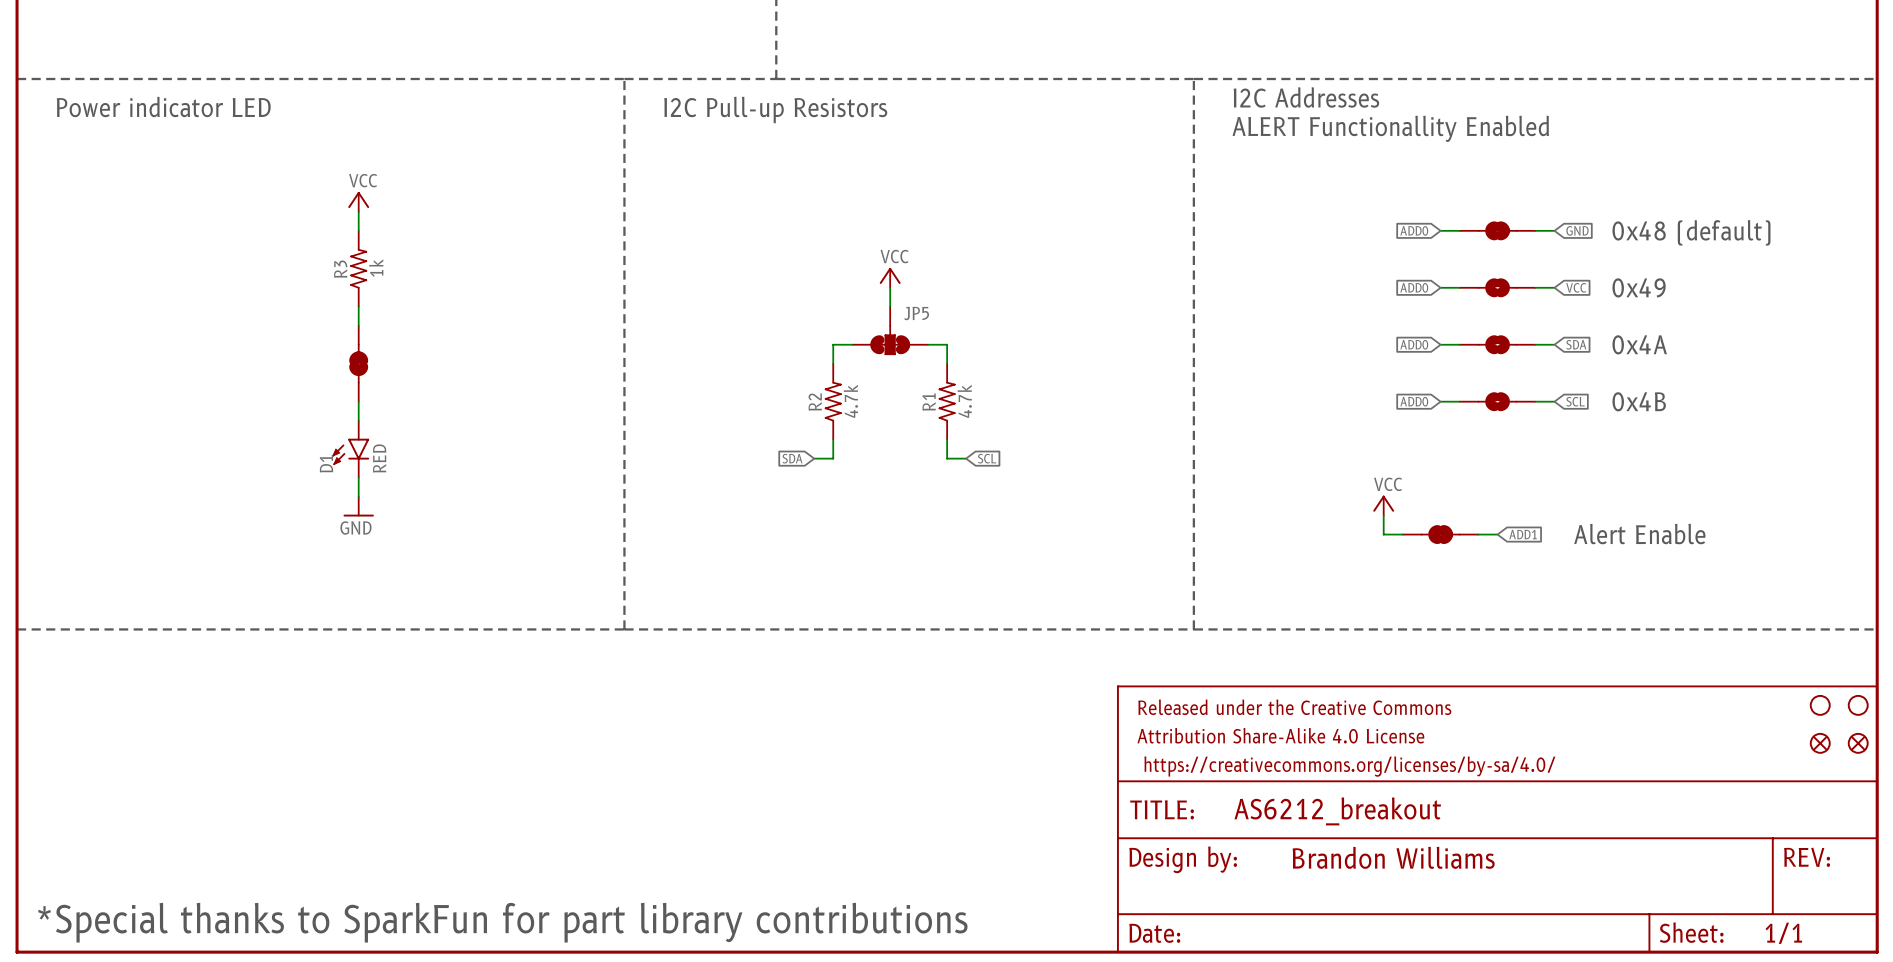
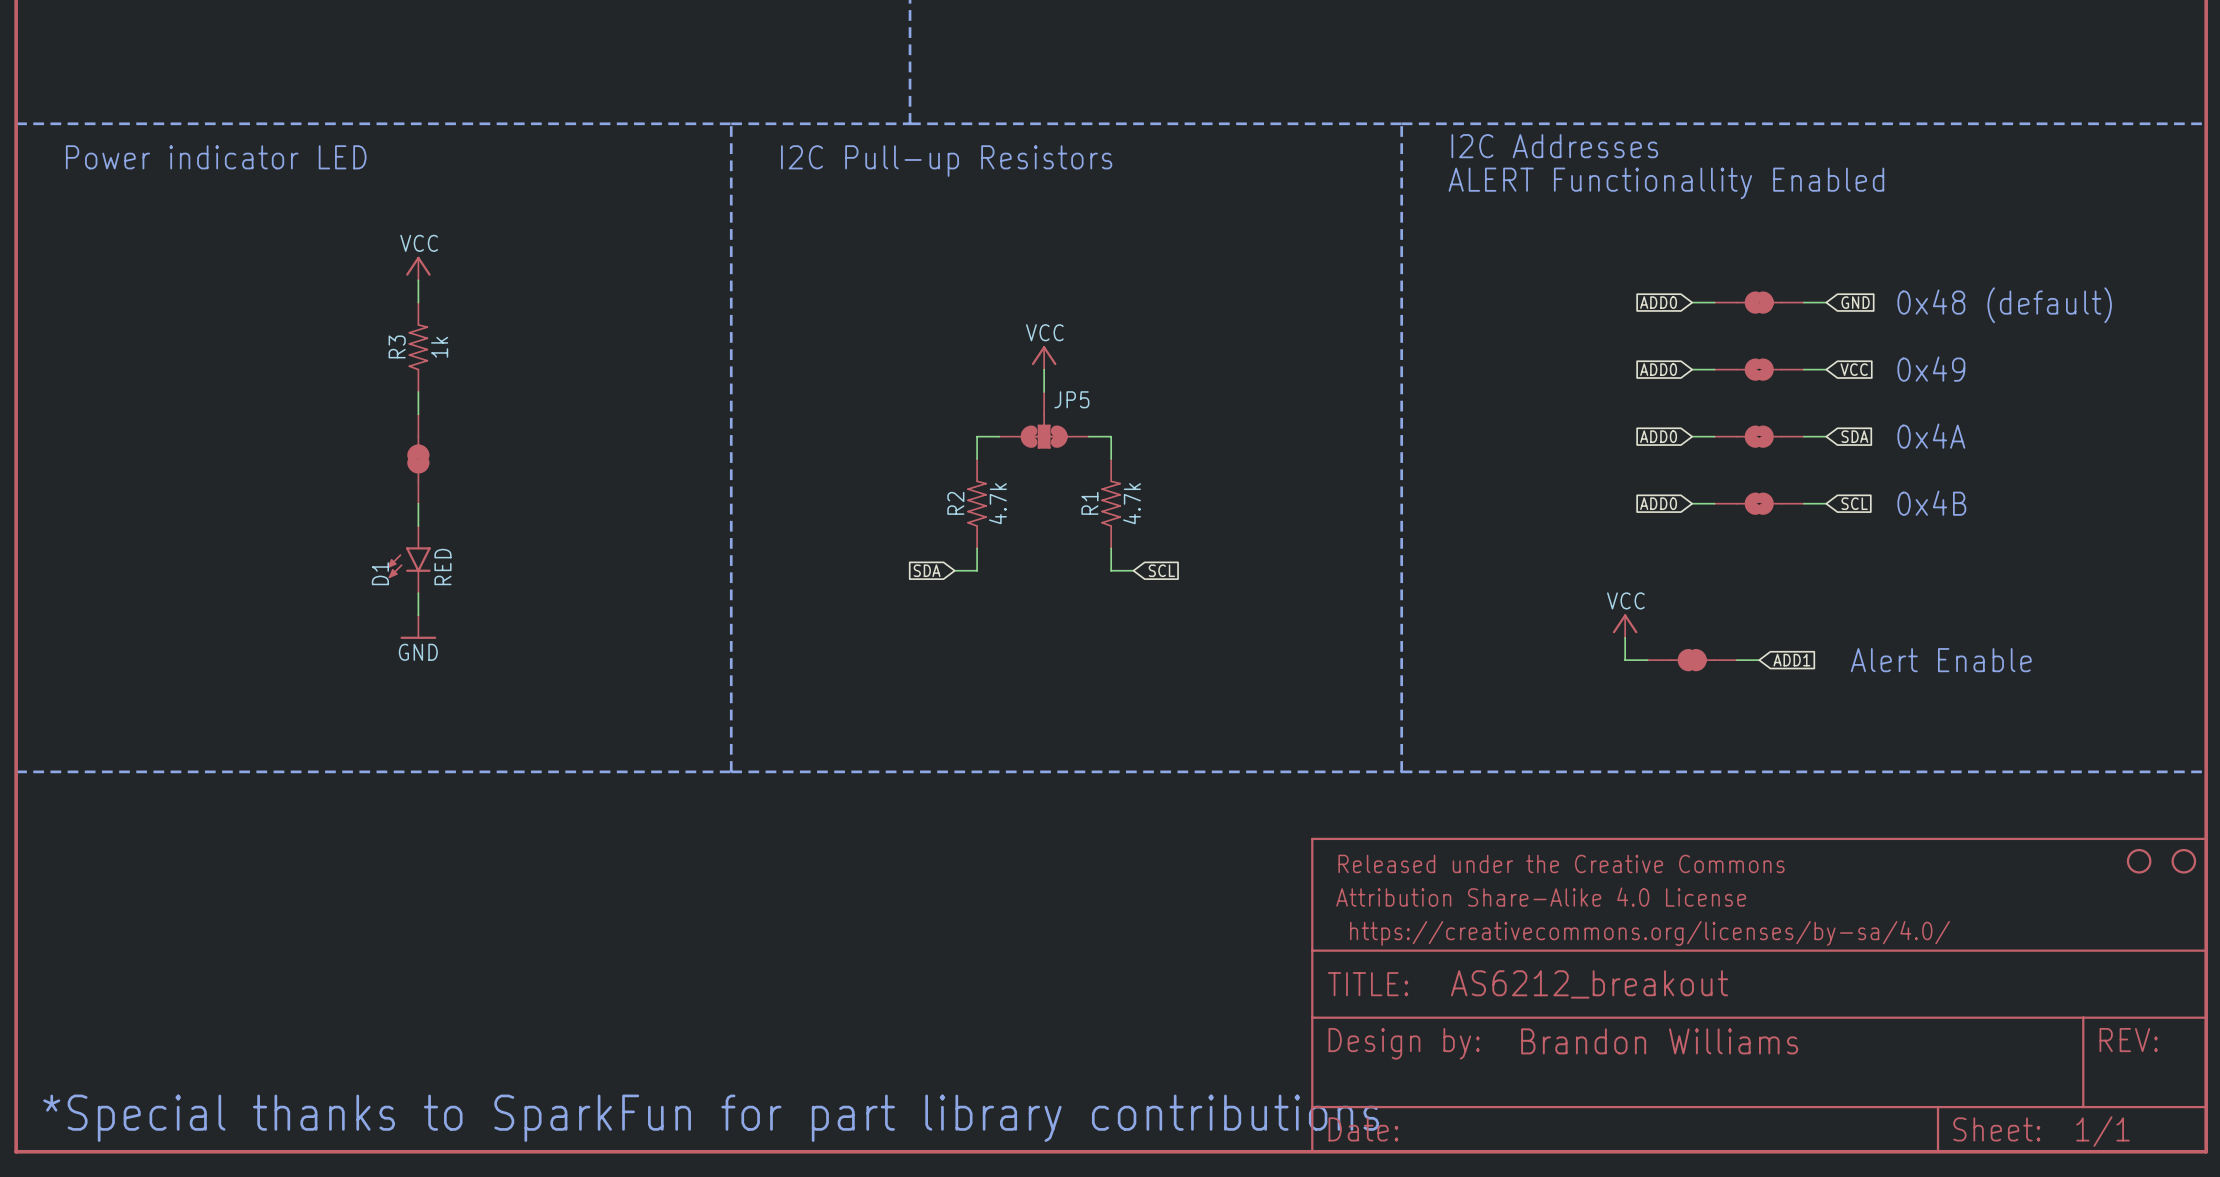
part: (1820, 743) -> none
part: (1858, 743) -> none

